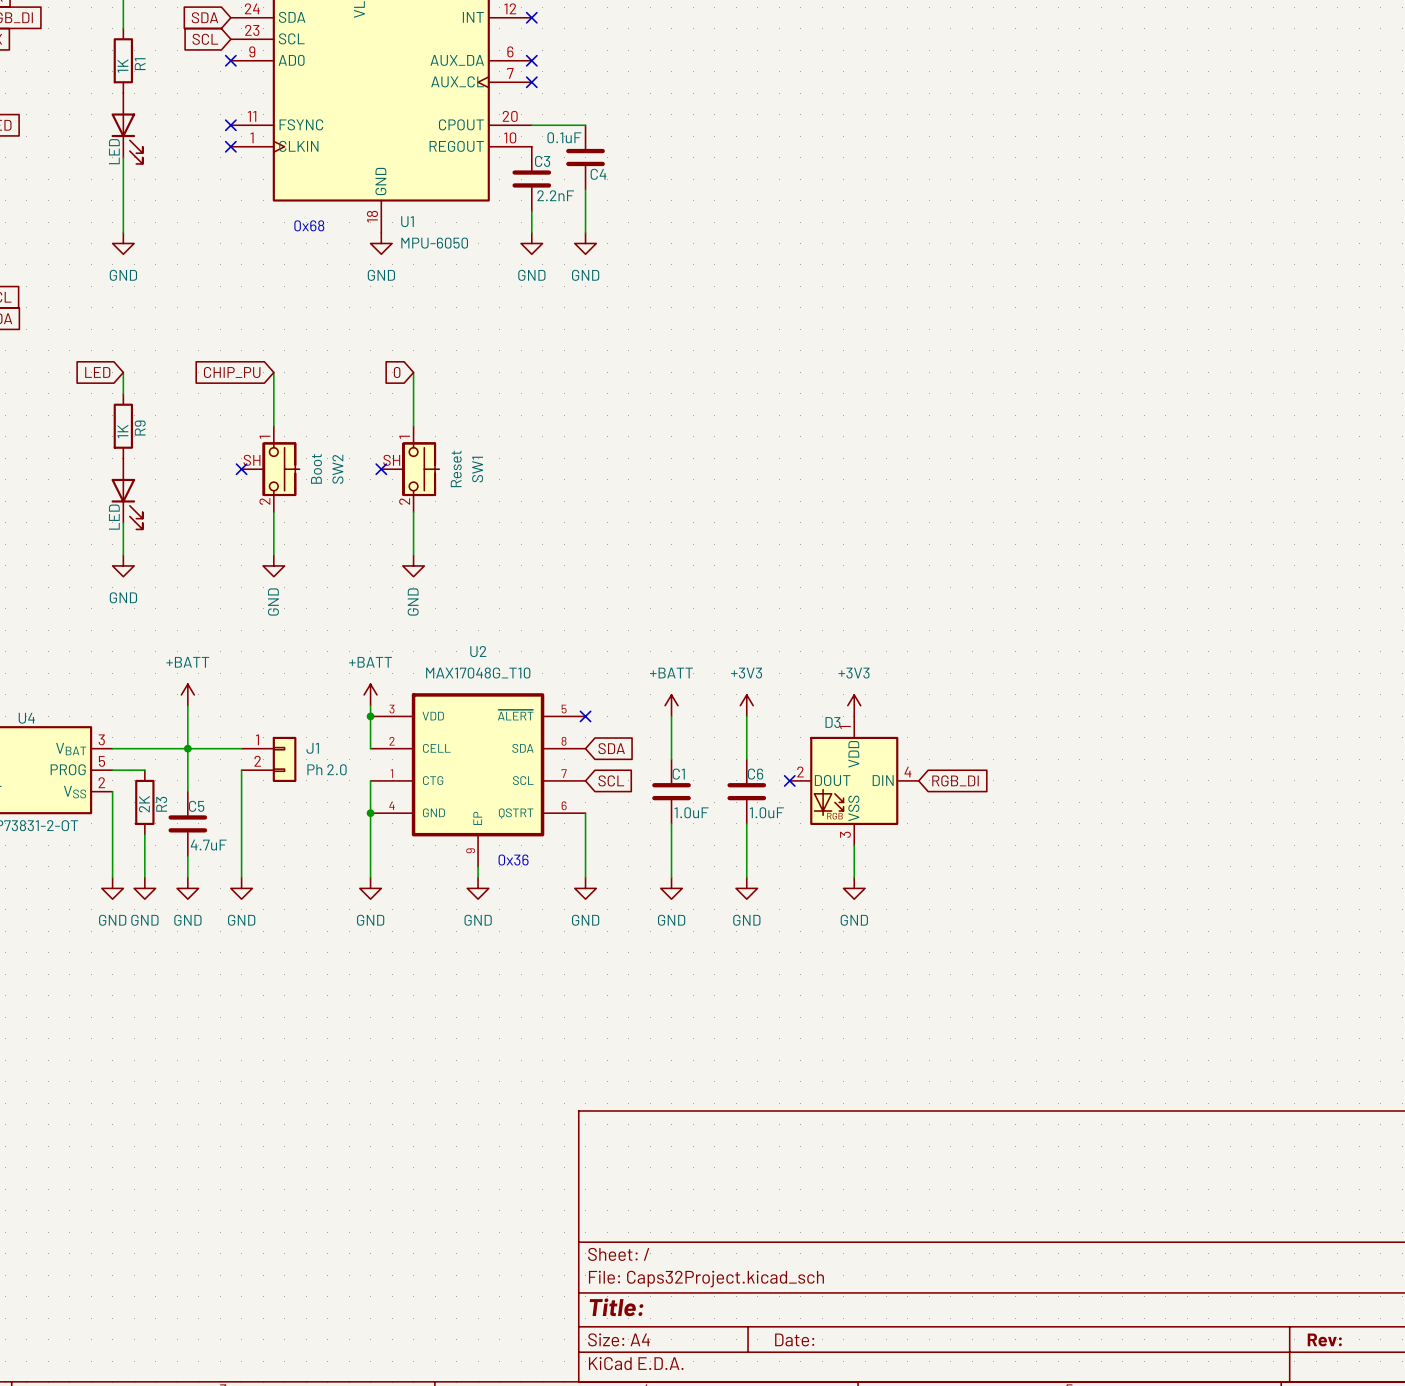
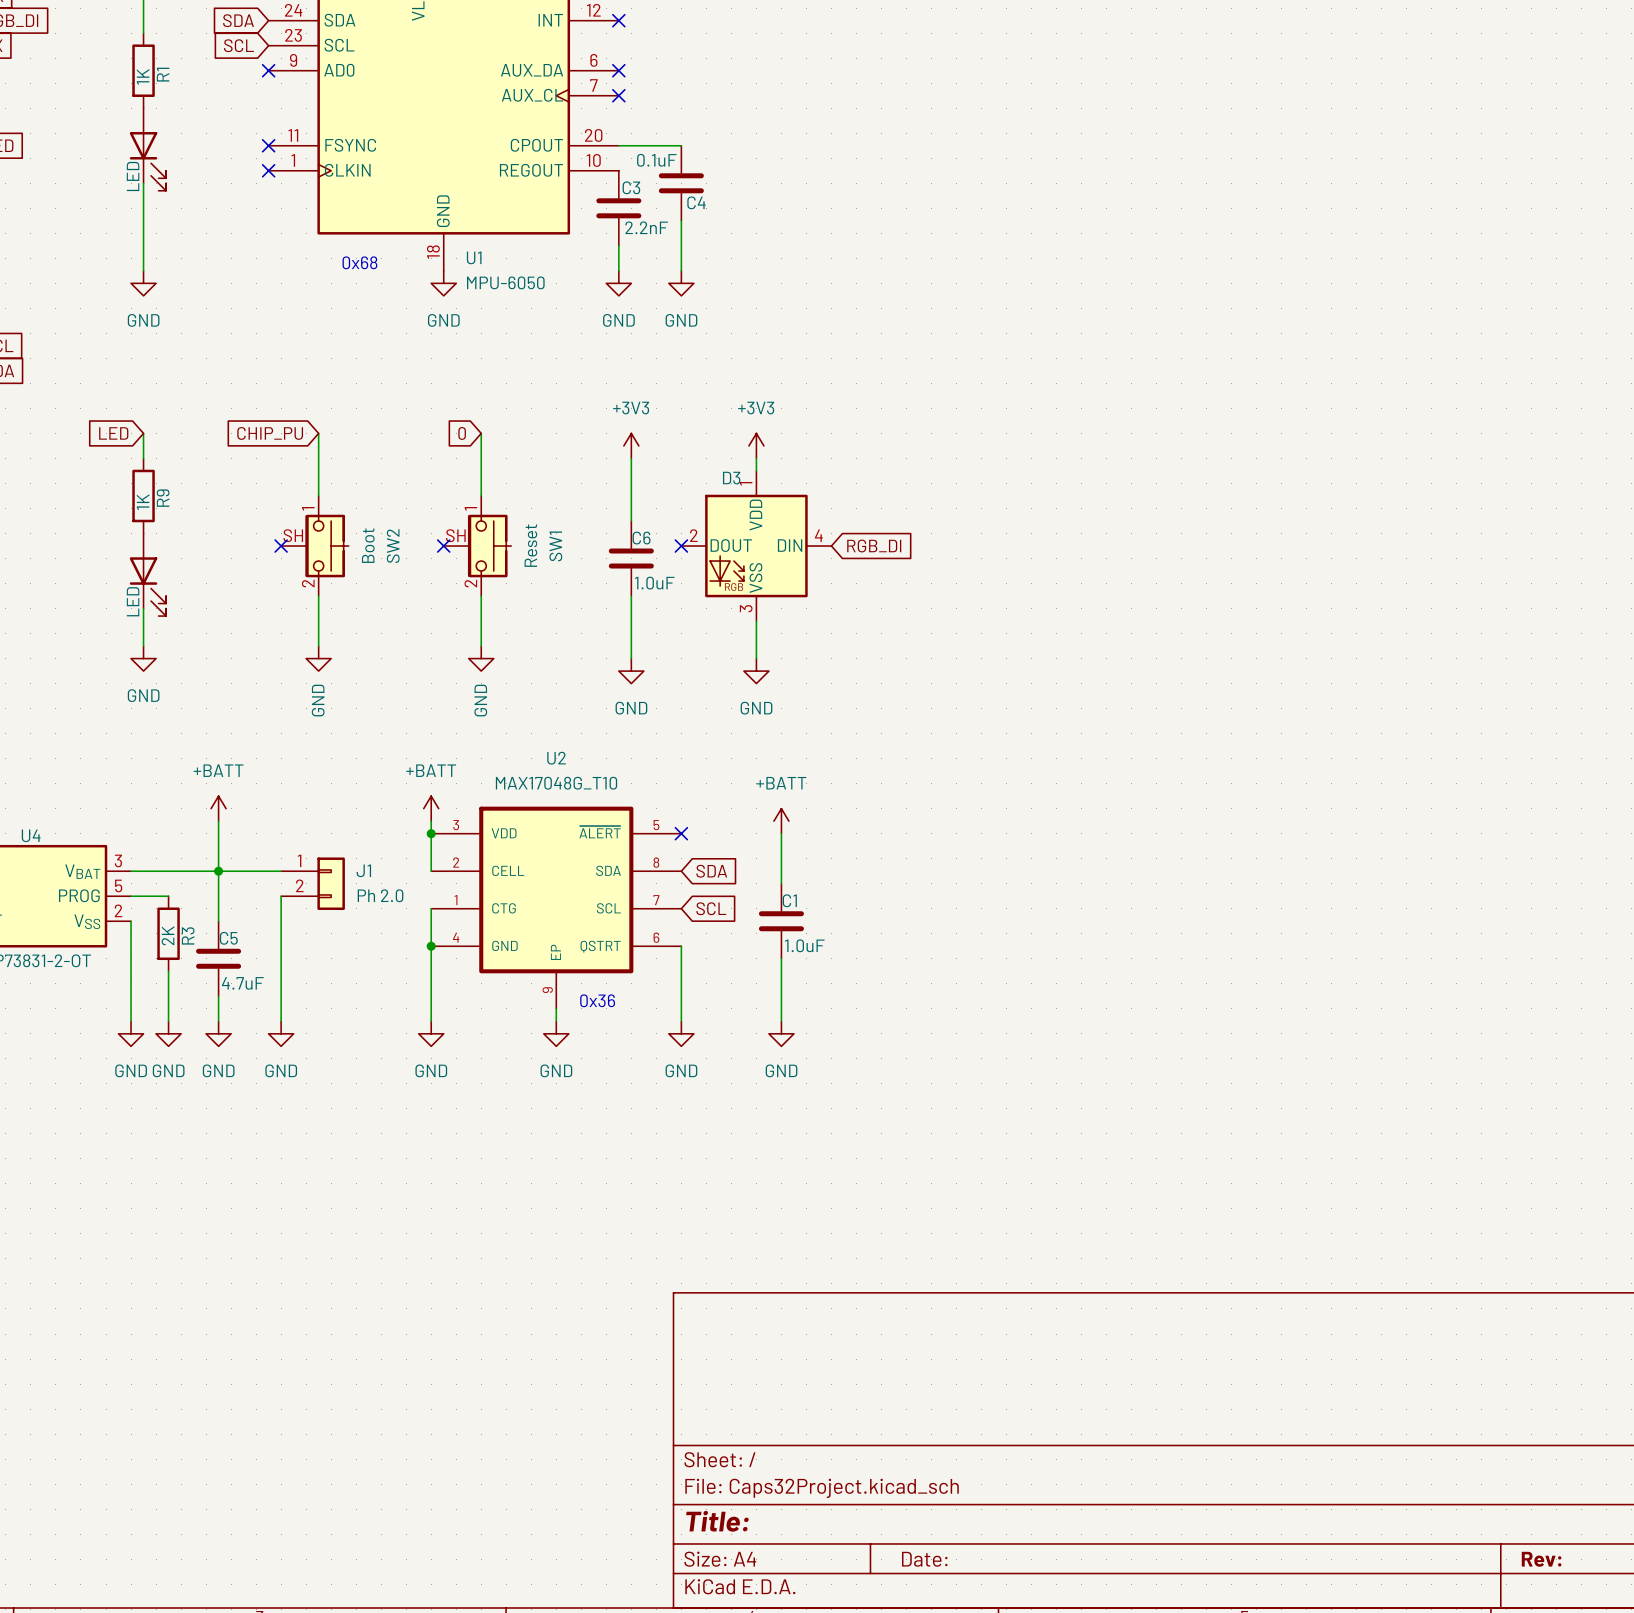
power symbol: none -> +3V3 (631, 445)
power symbol: none -> +3V3 (756, 445)
wire: none -> (631, 458) (631, 521)
wire: none -> (756, 458) (756, 470)
no-connect mark: none -> (681, 546)
global label: none -> RGB_DI (874, 546)
wire: none -> (631, 596) (631, 658)
wire: none -> (756, 621) (756, 658)
power symbol: none -> GND (631, 671)
power symbol: none -> GND (756, 671)
power symbol: +3V3 (746, 705) -> none
power symbol: +3V3 (854, 705) -> none
wire: (746, 716) (746, 759) -> none
no-connect mark: (789, 780) -> none
D3 position: (854, 780) -> (756, 546)
global label: RGB_DI (955, 780) -> none
C6 position: (746, 791) -> (631, 558)
wire: (746, 823) (746, 877) -> none
wire: (854, 845) (854, 877) -> none
power symbol: GND (746, 888) -> none
power symbol: GND (854, 888) -> none

